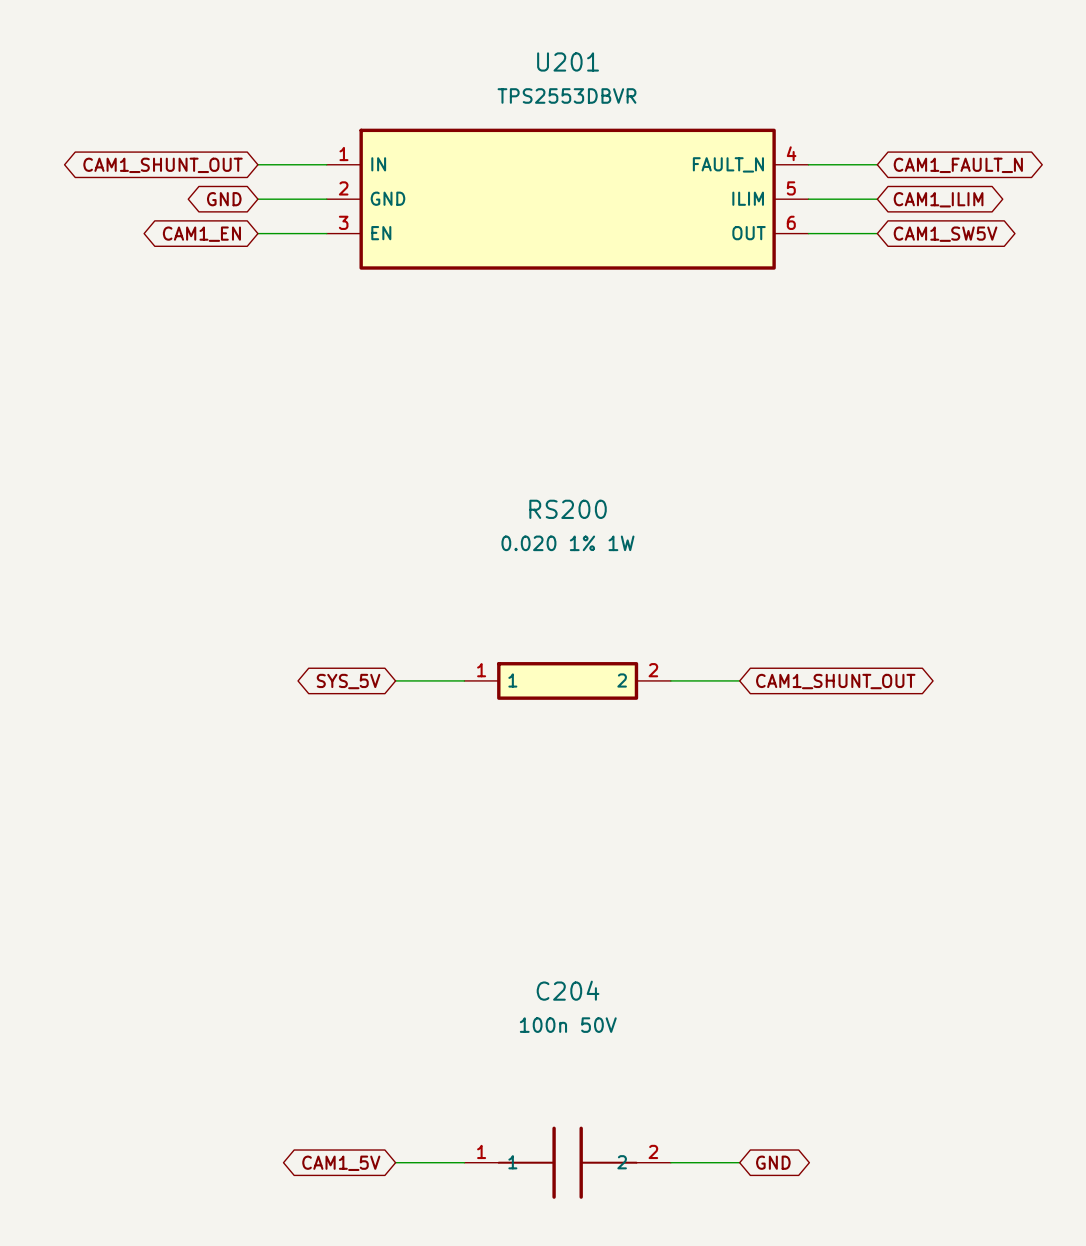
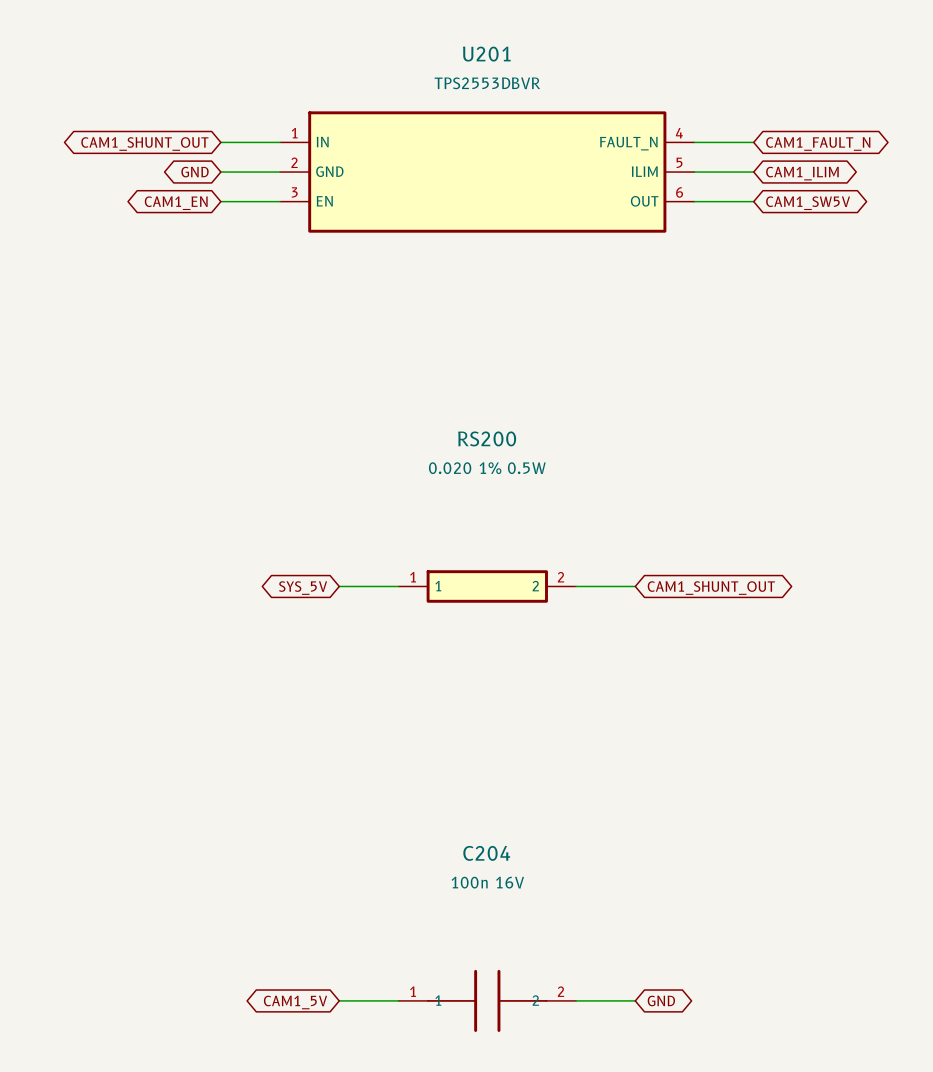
RS200 value: 0.020 1% 1W (567, 543) -> 0.020 1% 0.5W (487, 468)
C204 value: 100n 50V (568, 1025) -> 100n 16V (487, 882)

